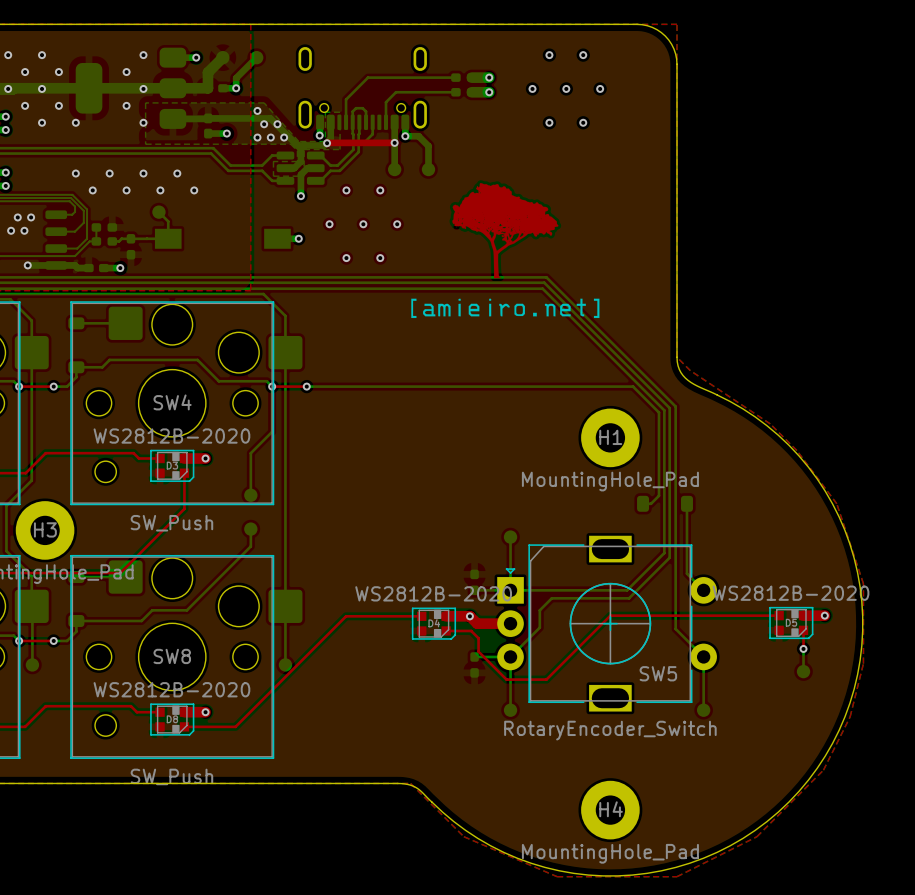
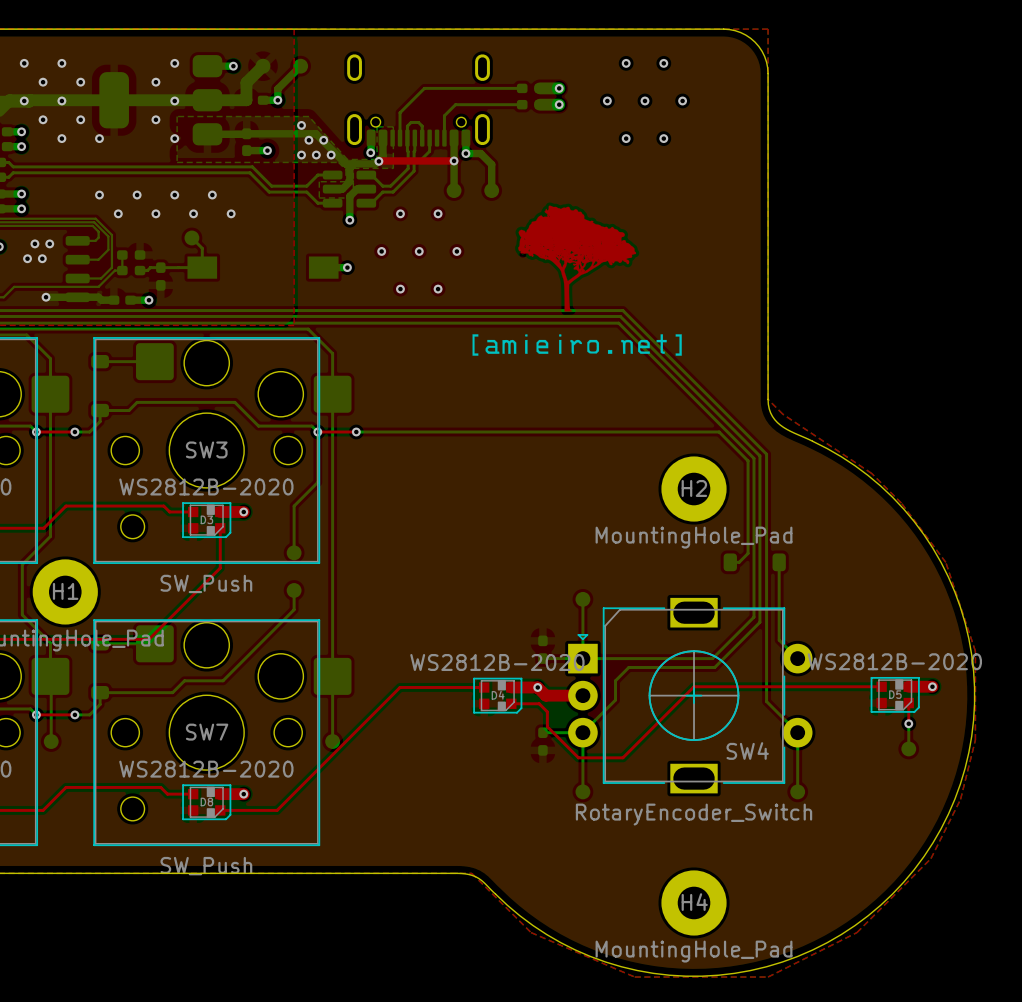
SW4 name: SW4 (172, 402) -> SW3 (206, 449)
H1 name: H1 (610, 437) -> H2 (694, 488)
H3 name: H3 (45, 529) -> H1 (65, 591)
SW8 name: SW8 (172, 656) -> SW7 (207, 732)
SW5 name: SW5 (658, 673) -> SW4 (747, 751)

